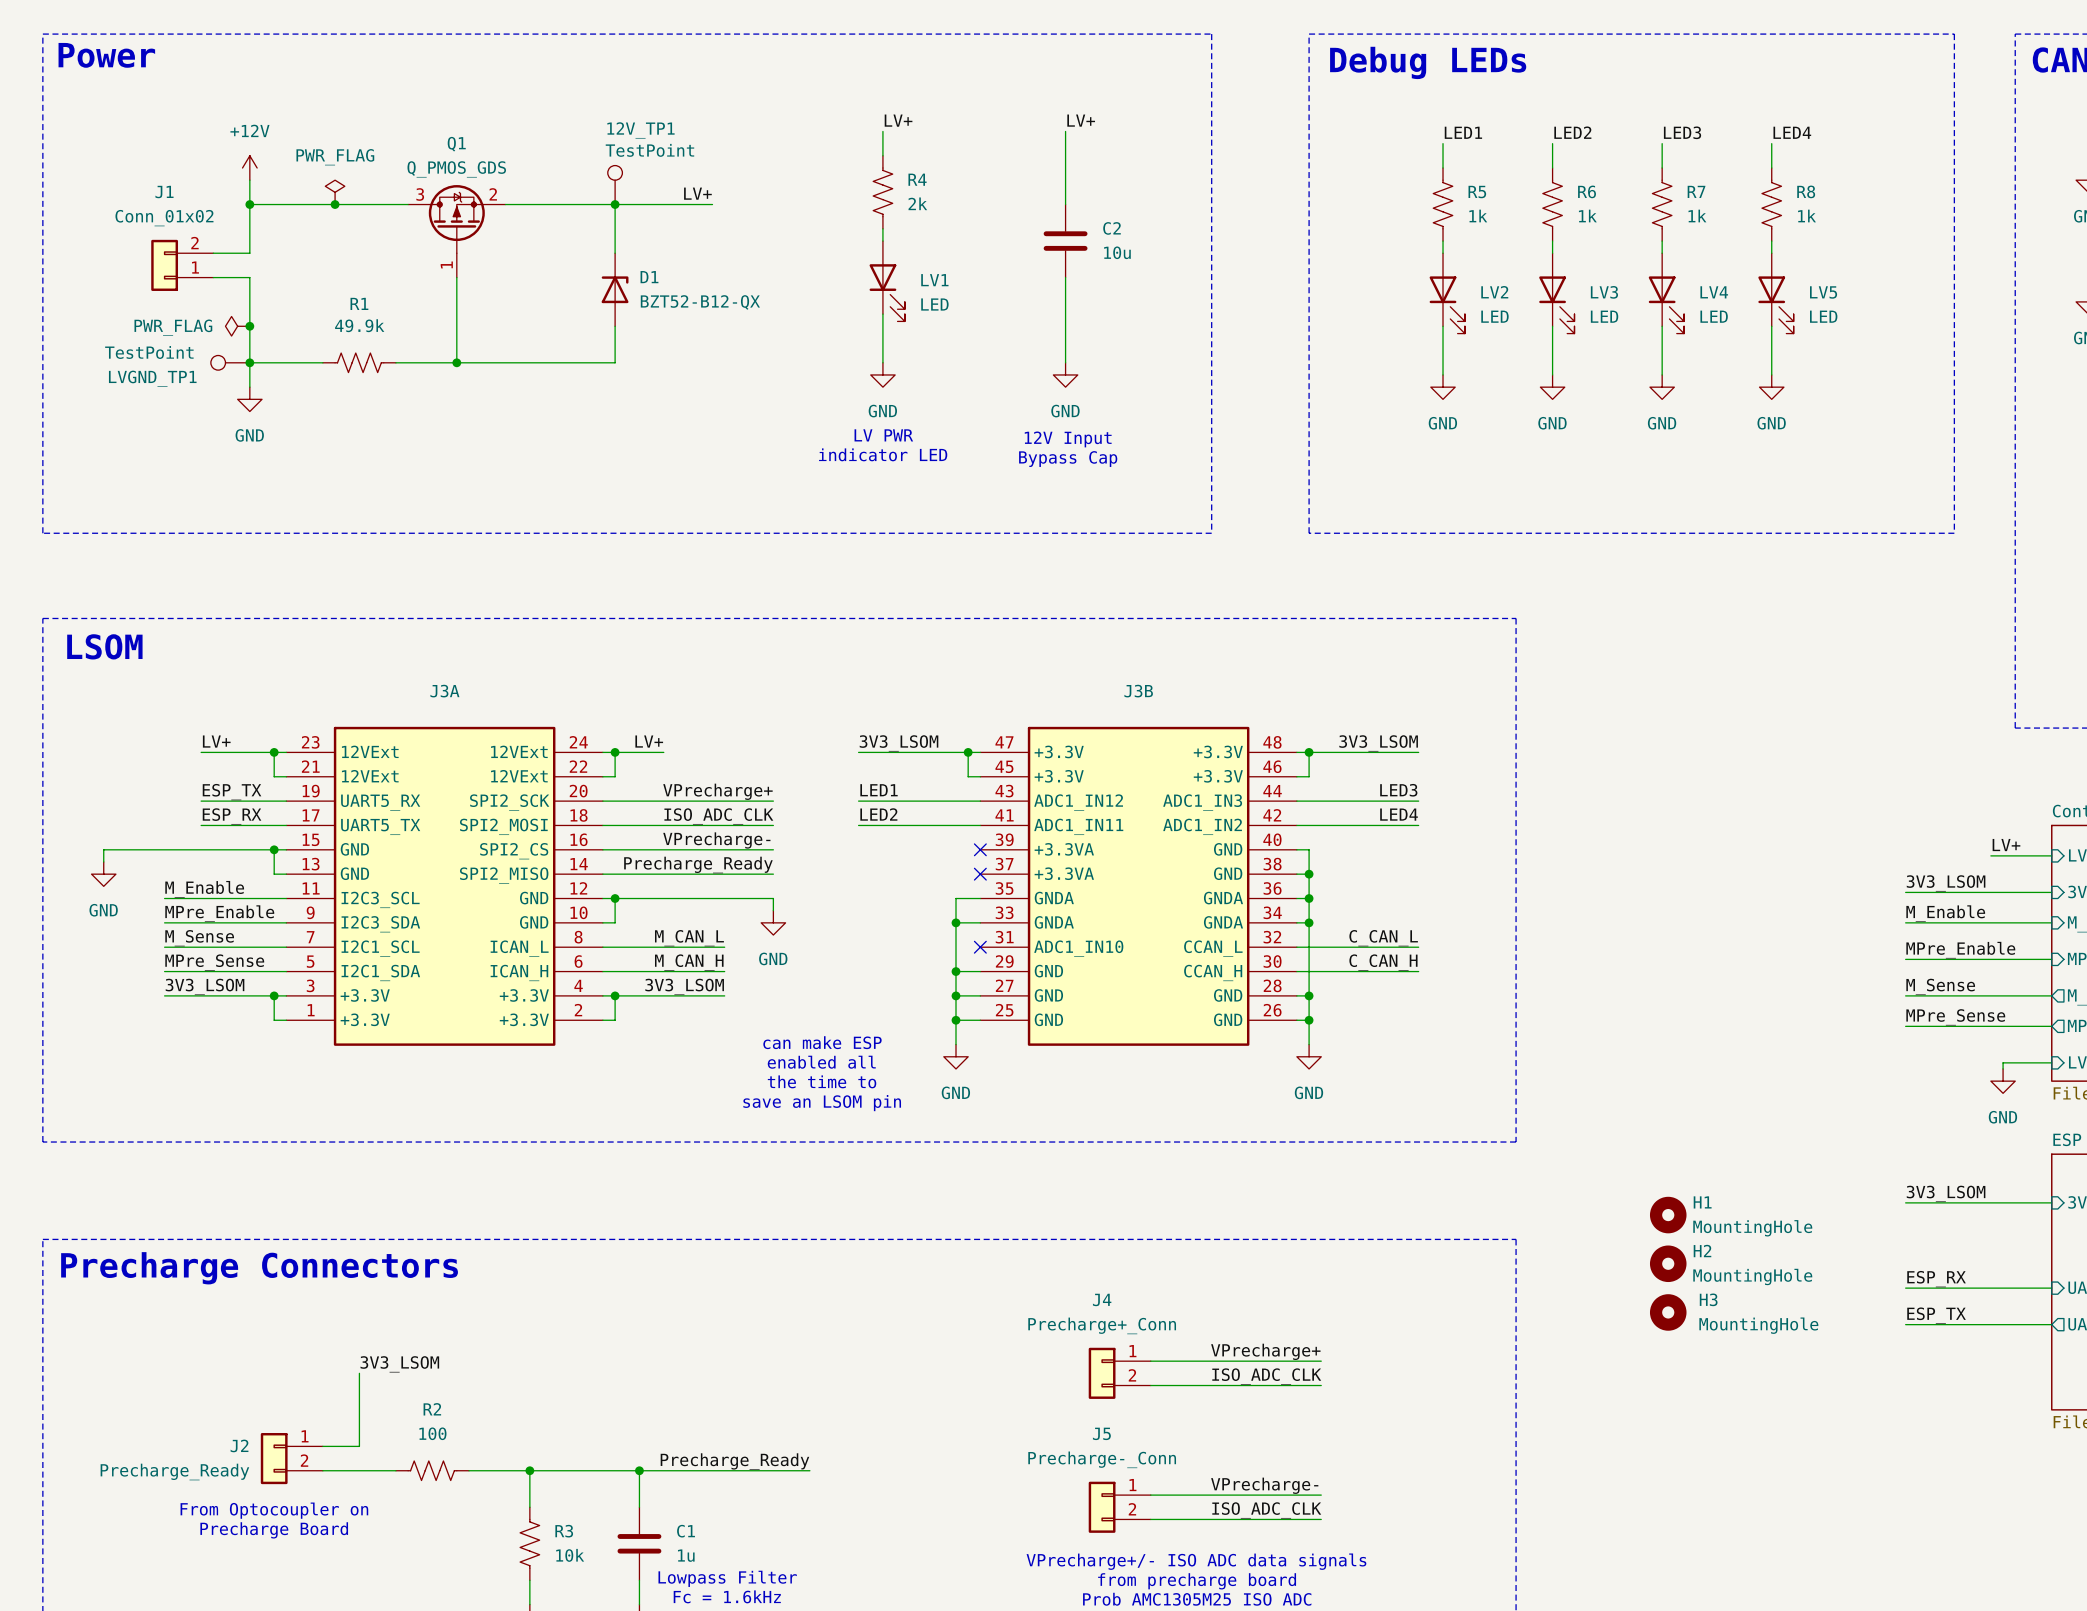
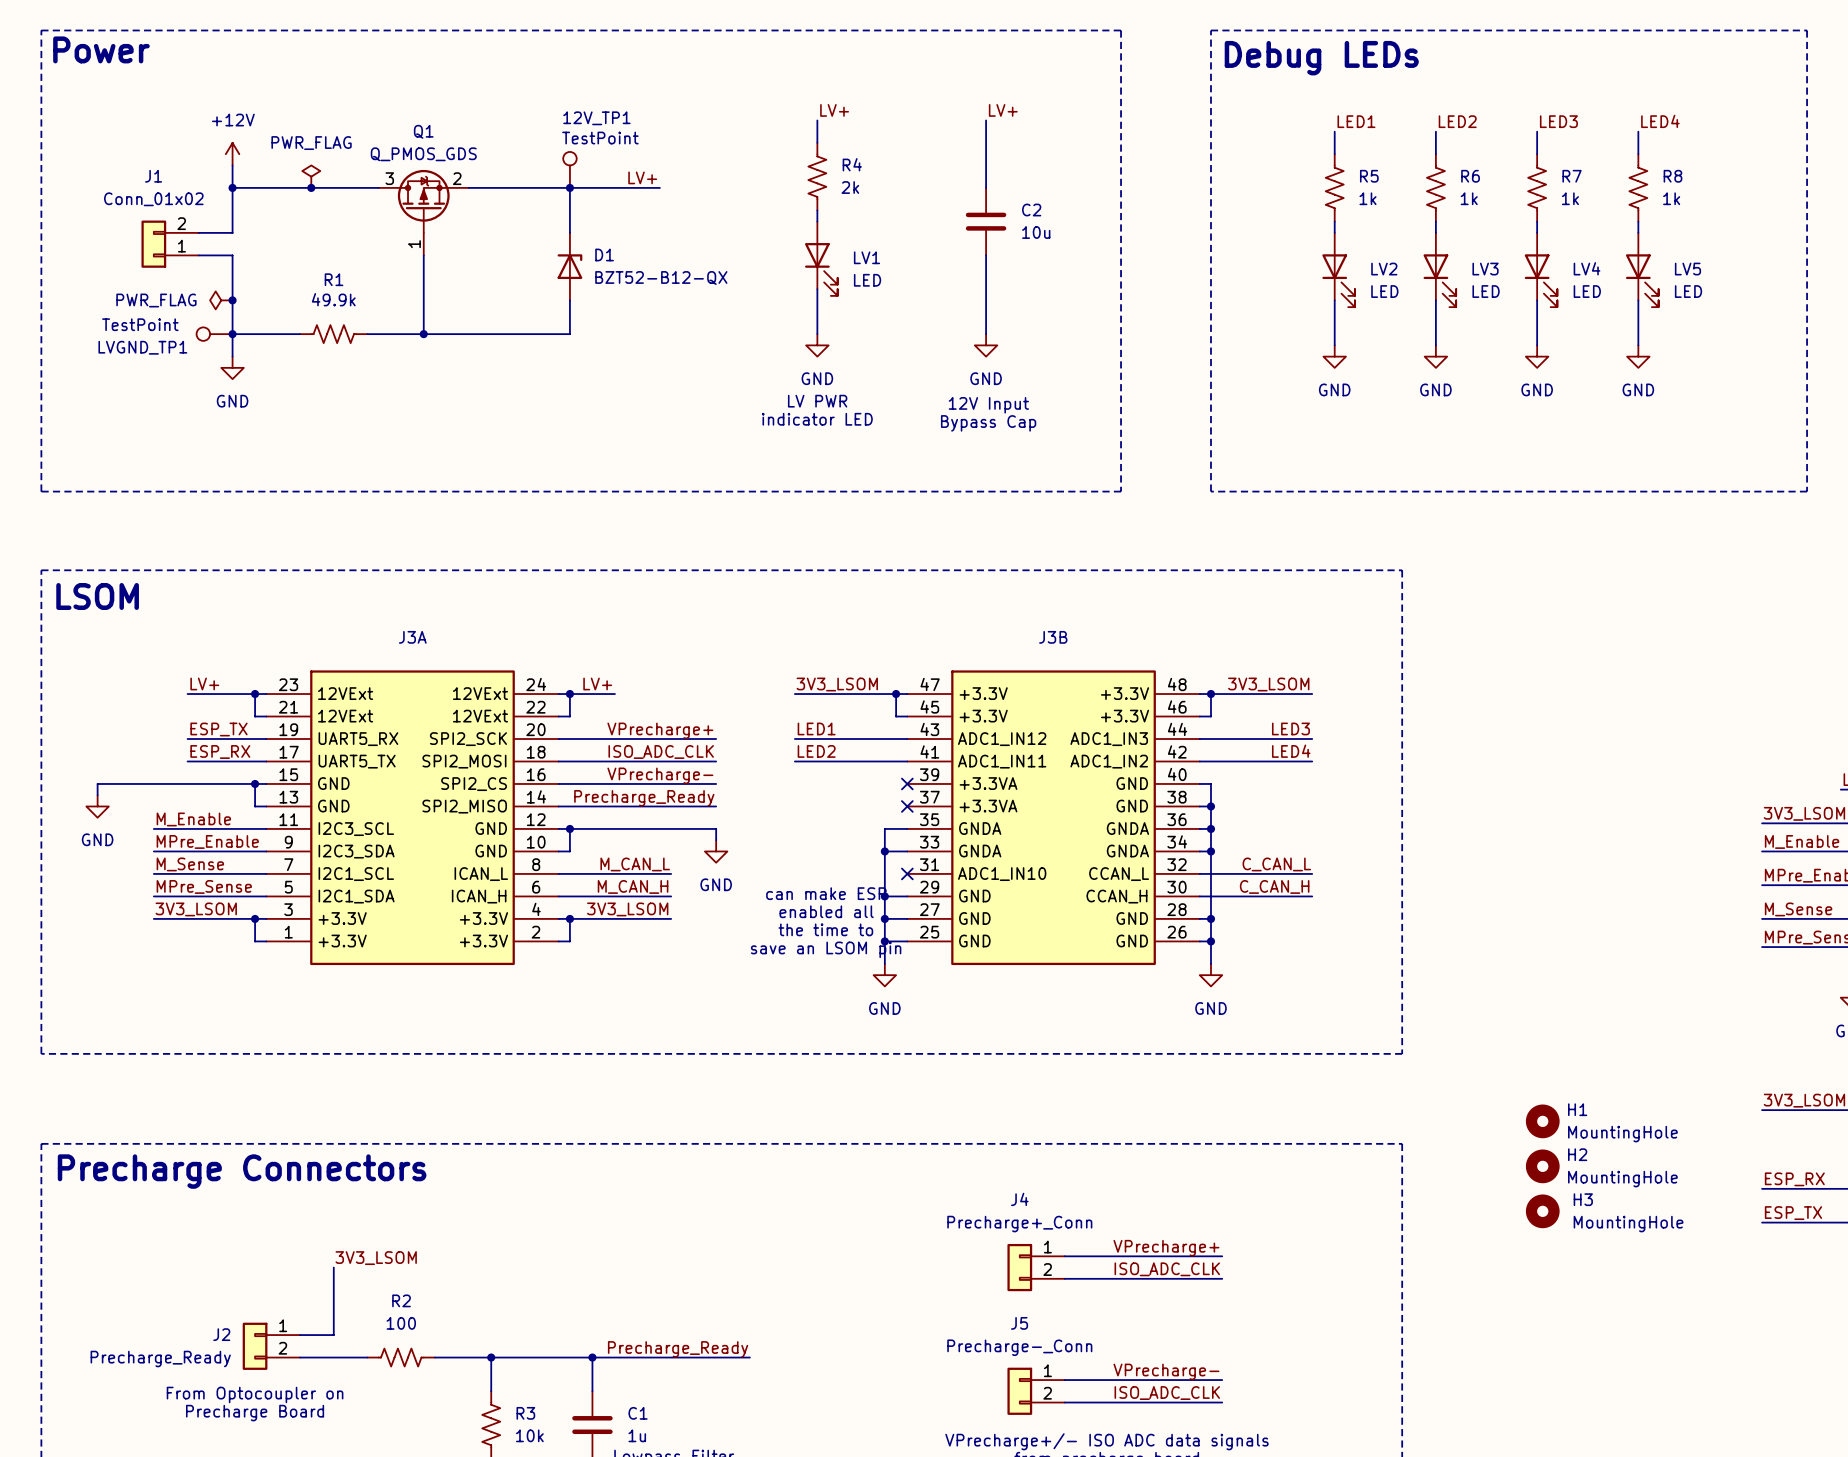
text position: can make ESP (822, 1042) -> can make ESP (826, 893)
text position: enabled all (821, 1062) -> enabled all (826, 911)
text position: the time to (822, 1081) -> the time to (825, 929)
text position: save an LSOM pin (822, 1103) -> save an LSOM pin (826, 949)

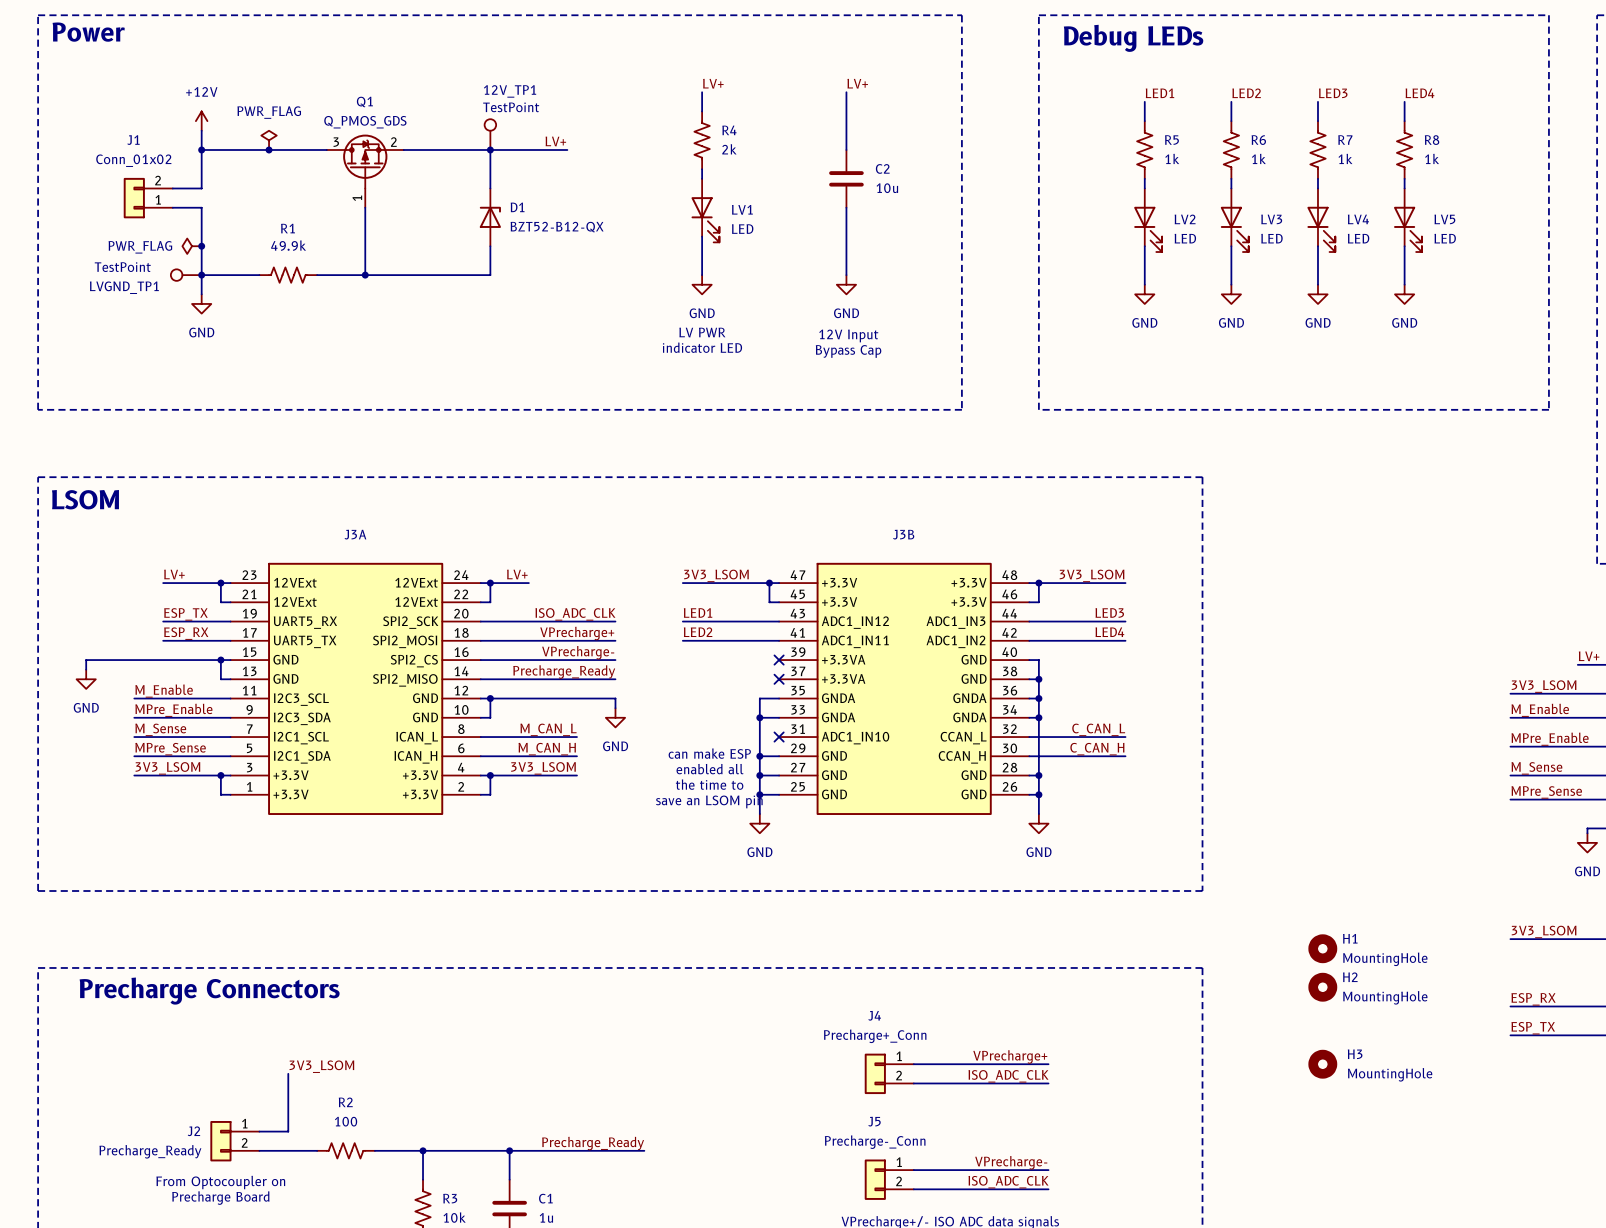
label: VPrecharge+ (660, 730) -> ISO_ADC_CLK (575, 614)
label: ISO_ADC_CLK (661, 751) -> VPrecharge+ (577, 633)
H3 position: (1542, 1211) -> (1322, 1064)

